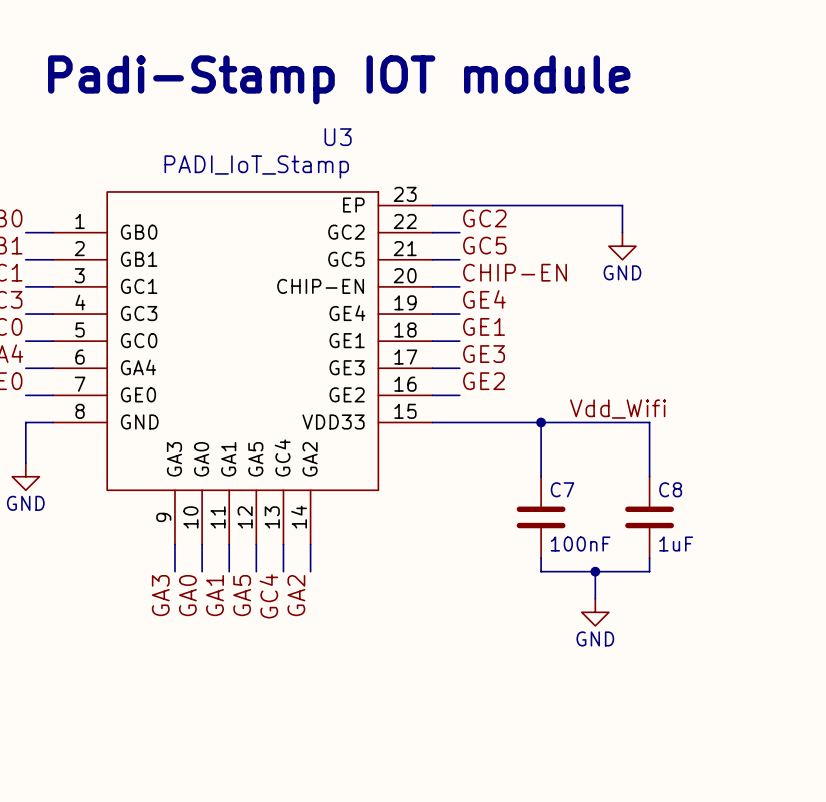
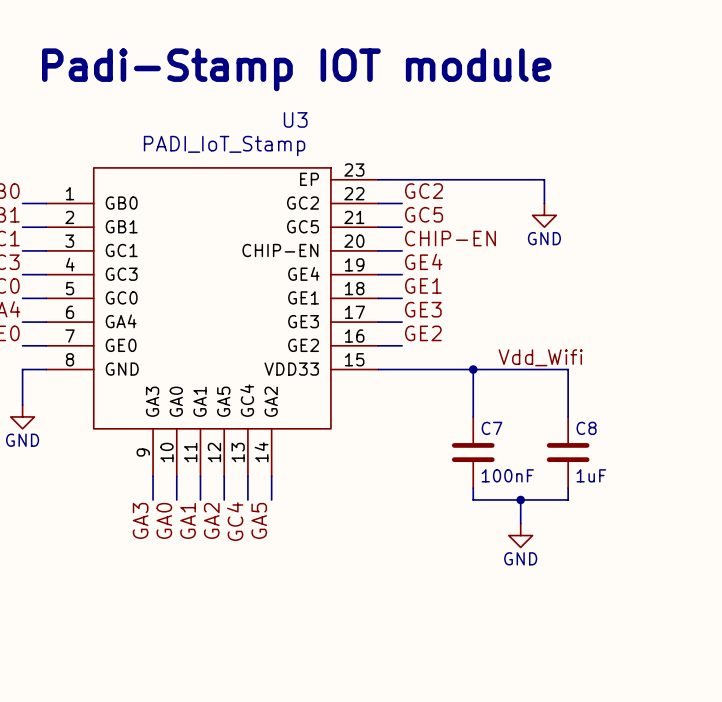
label: GA5 (242, 595) -> GA2 (211, 520)
label: GA2 (296, 595) -> GA5 (259, 520)

